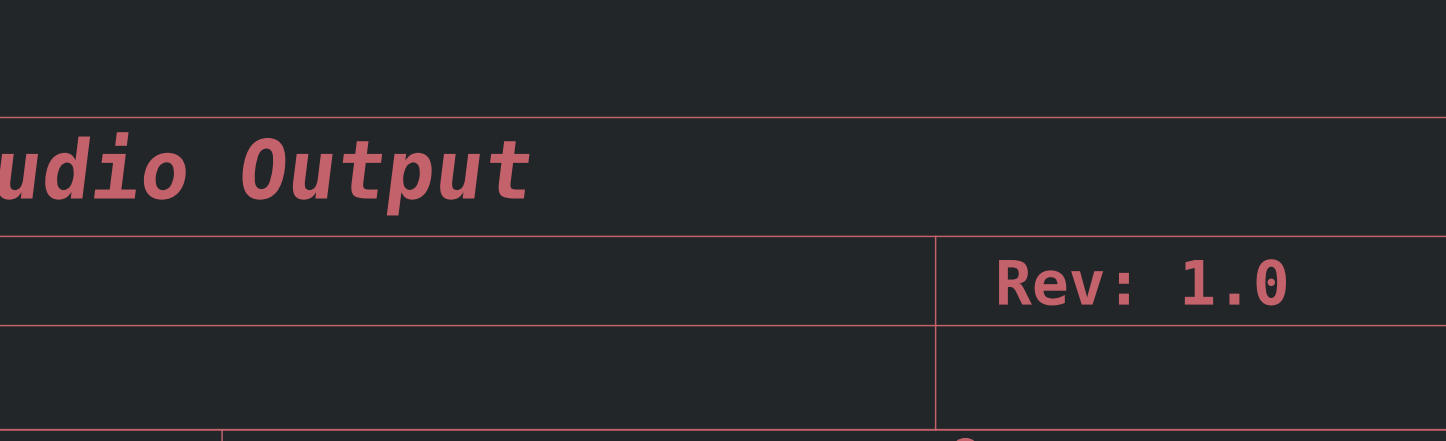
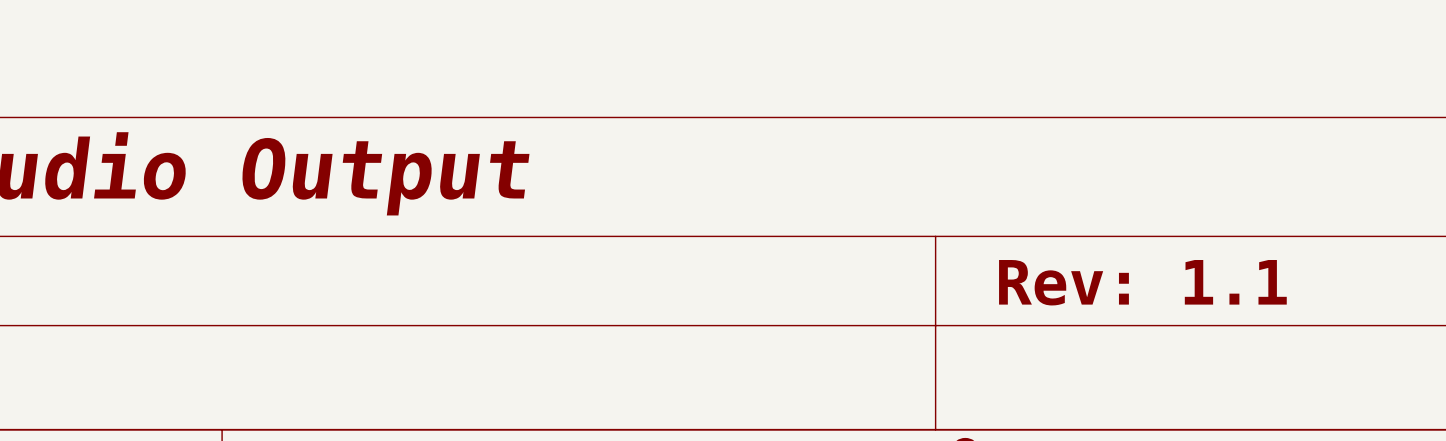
title block: Rev: 1.0 (1142, 282) -> Rev: 1.1 (1142, 282)

